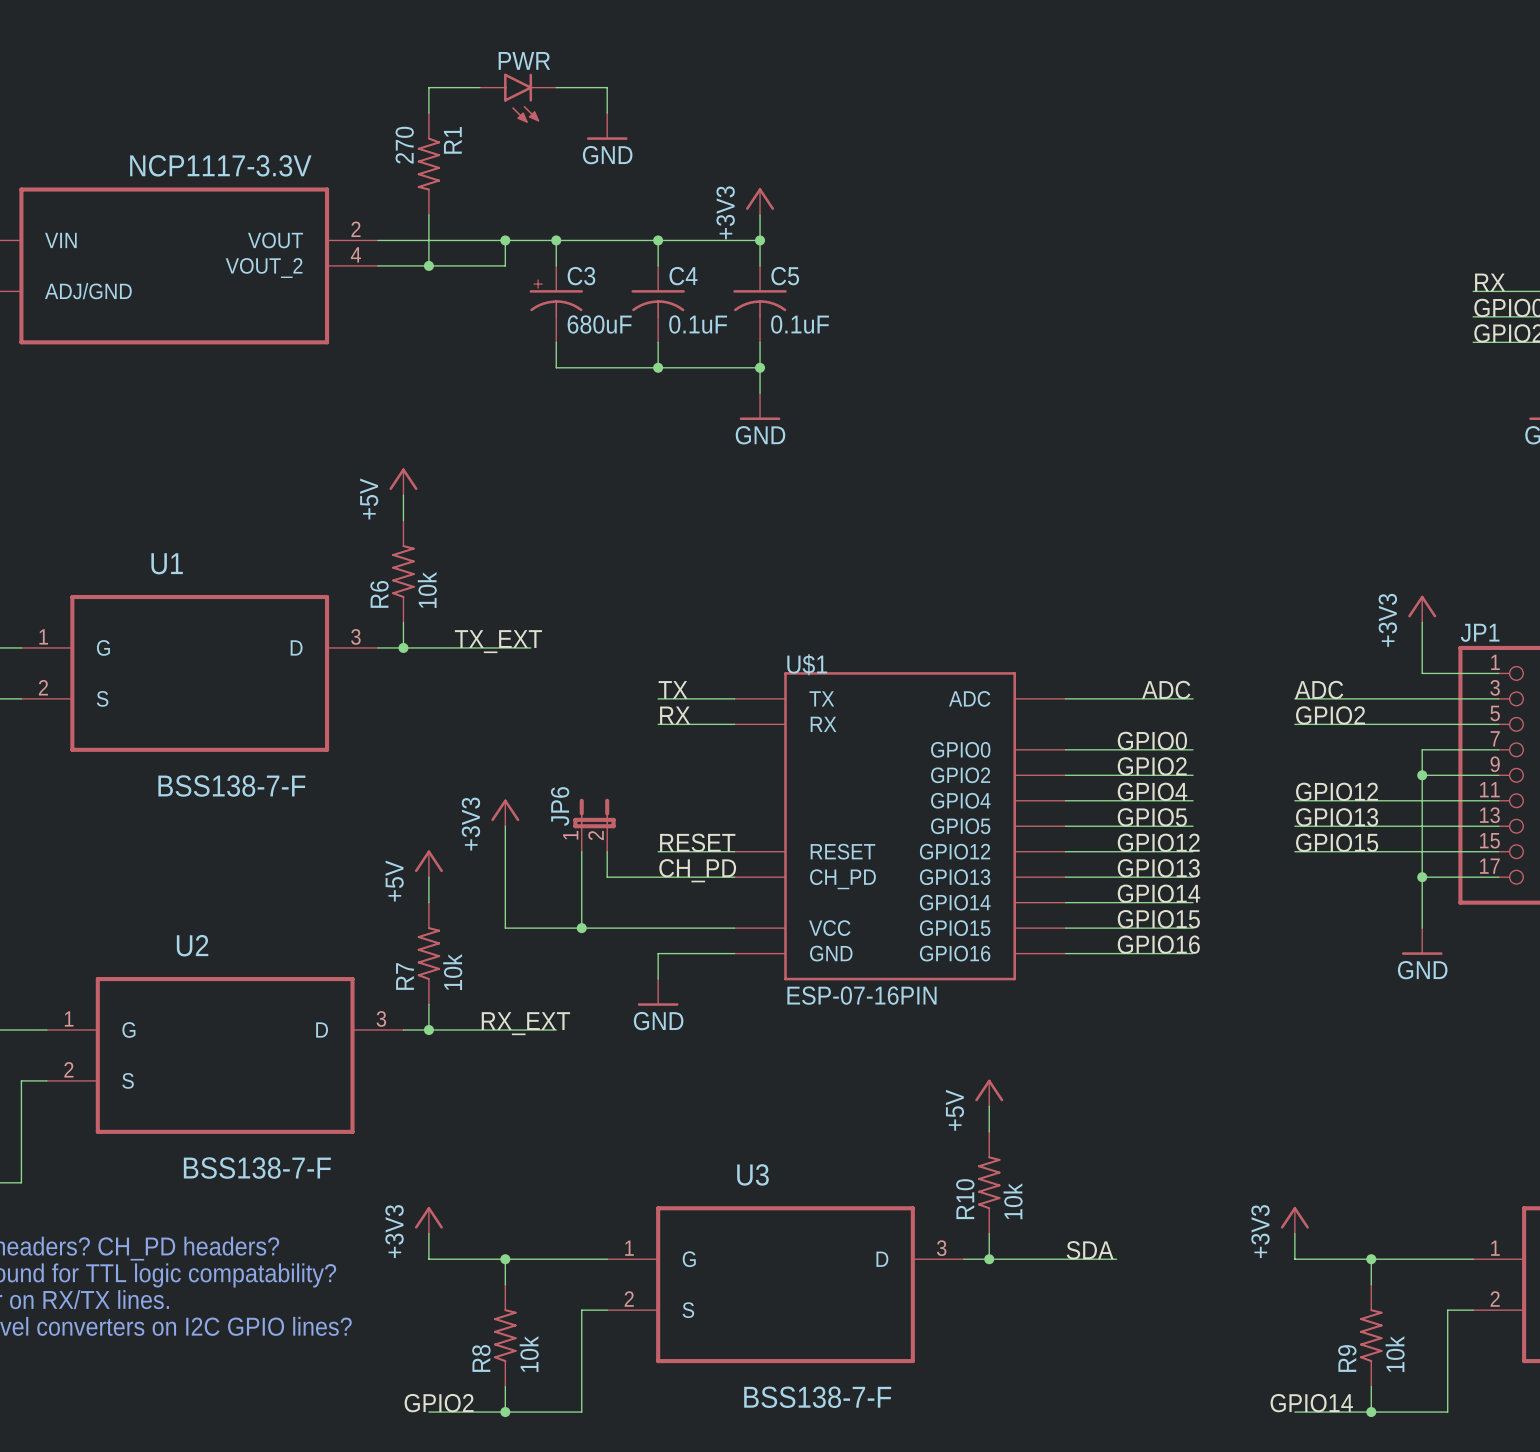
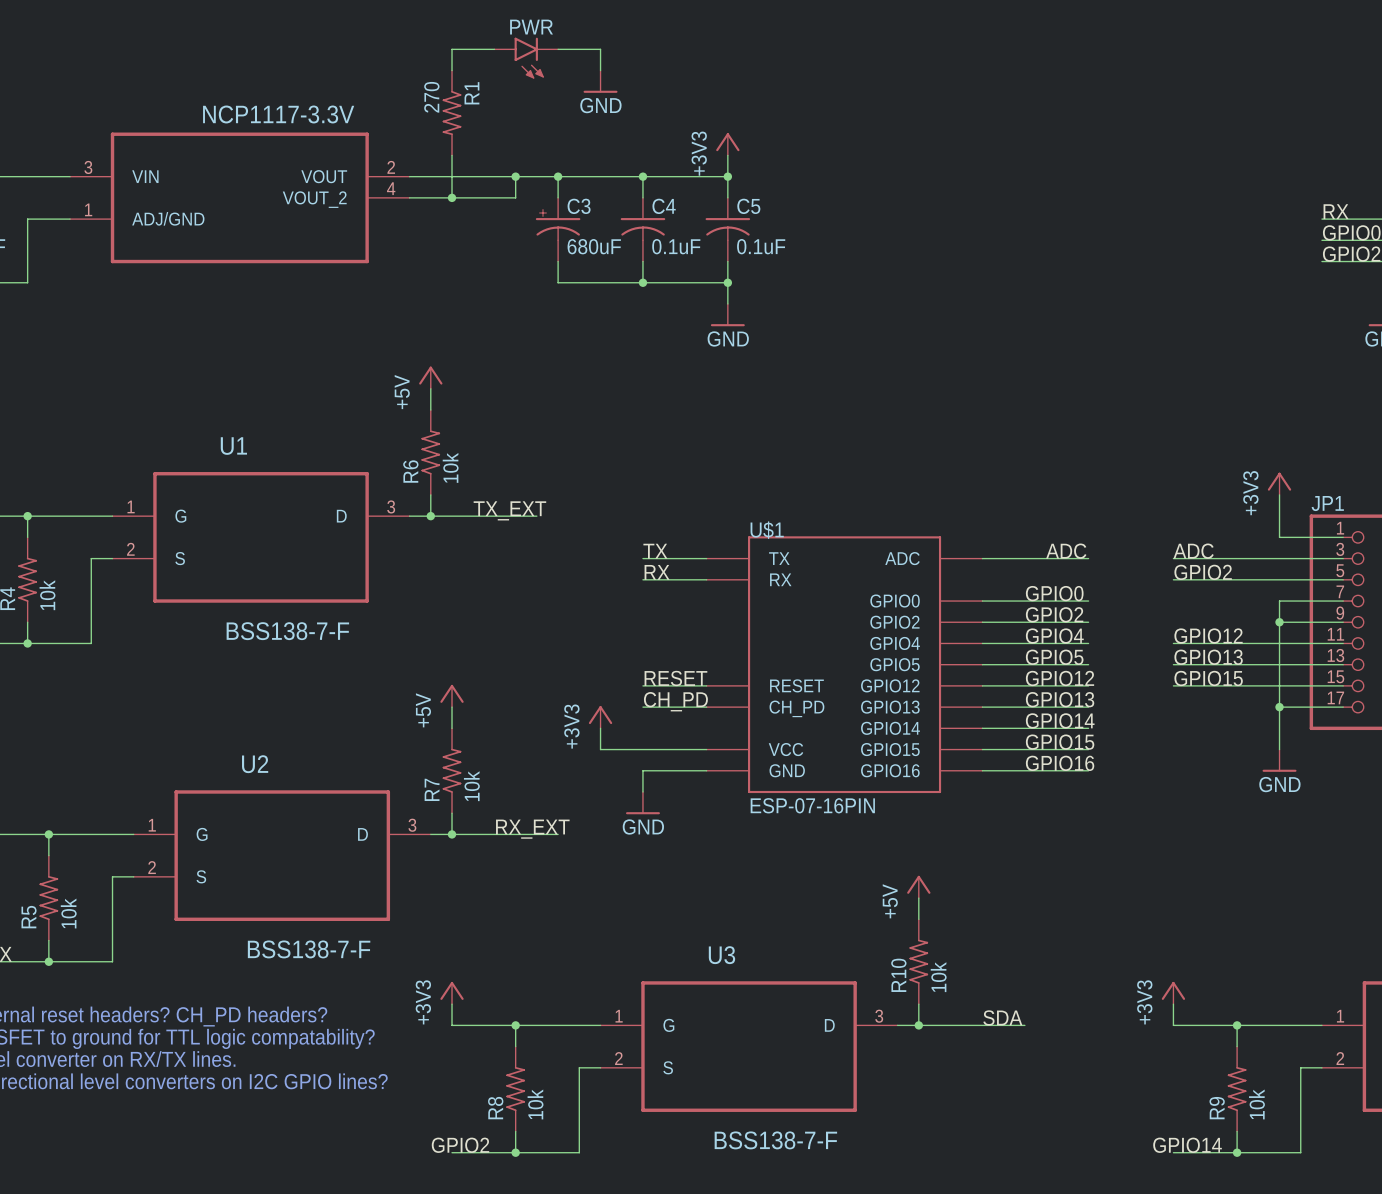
power symbol position: +3V3 (505, 812) -> +3V3 (600, 717)
JP6: (594, 825) -> none
wire: (505, 826) (505, 928) (607, 928) -> (600, 728) (600, 749)
wire: (581, 851) (581, 928) -> none
wire: (607, 851) (607, 877) (658, 877) -> none
junction: (581, 928) -> none

